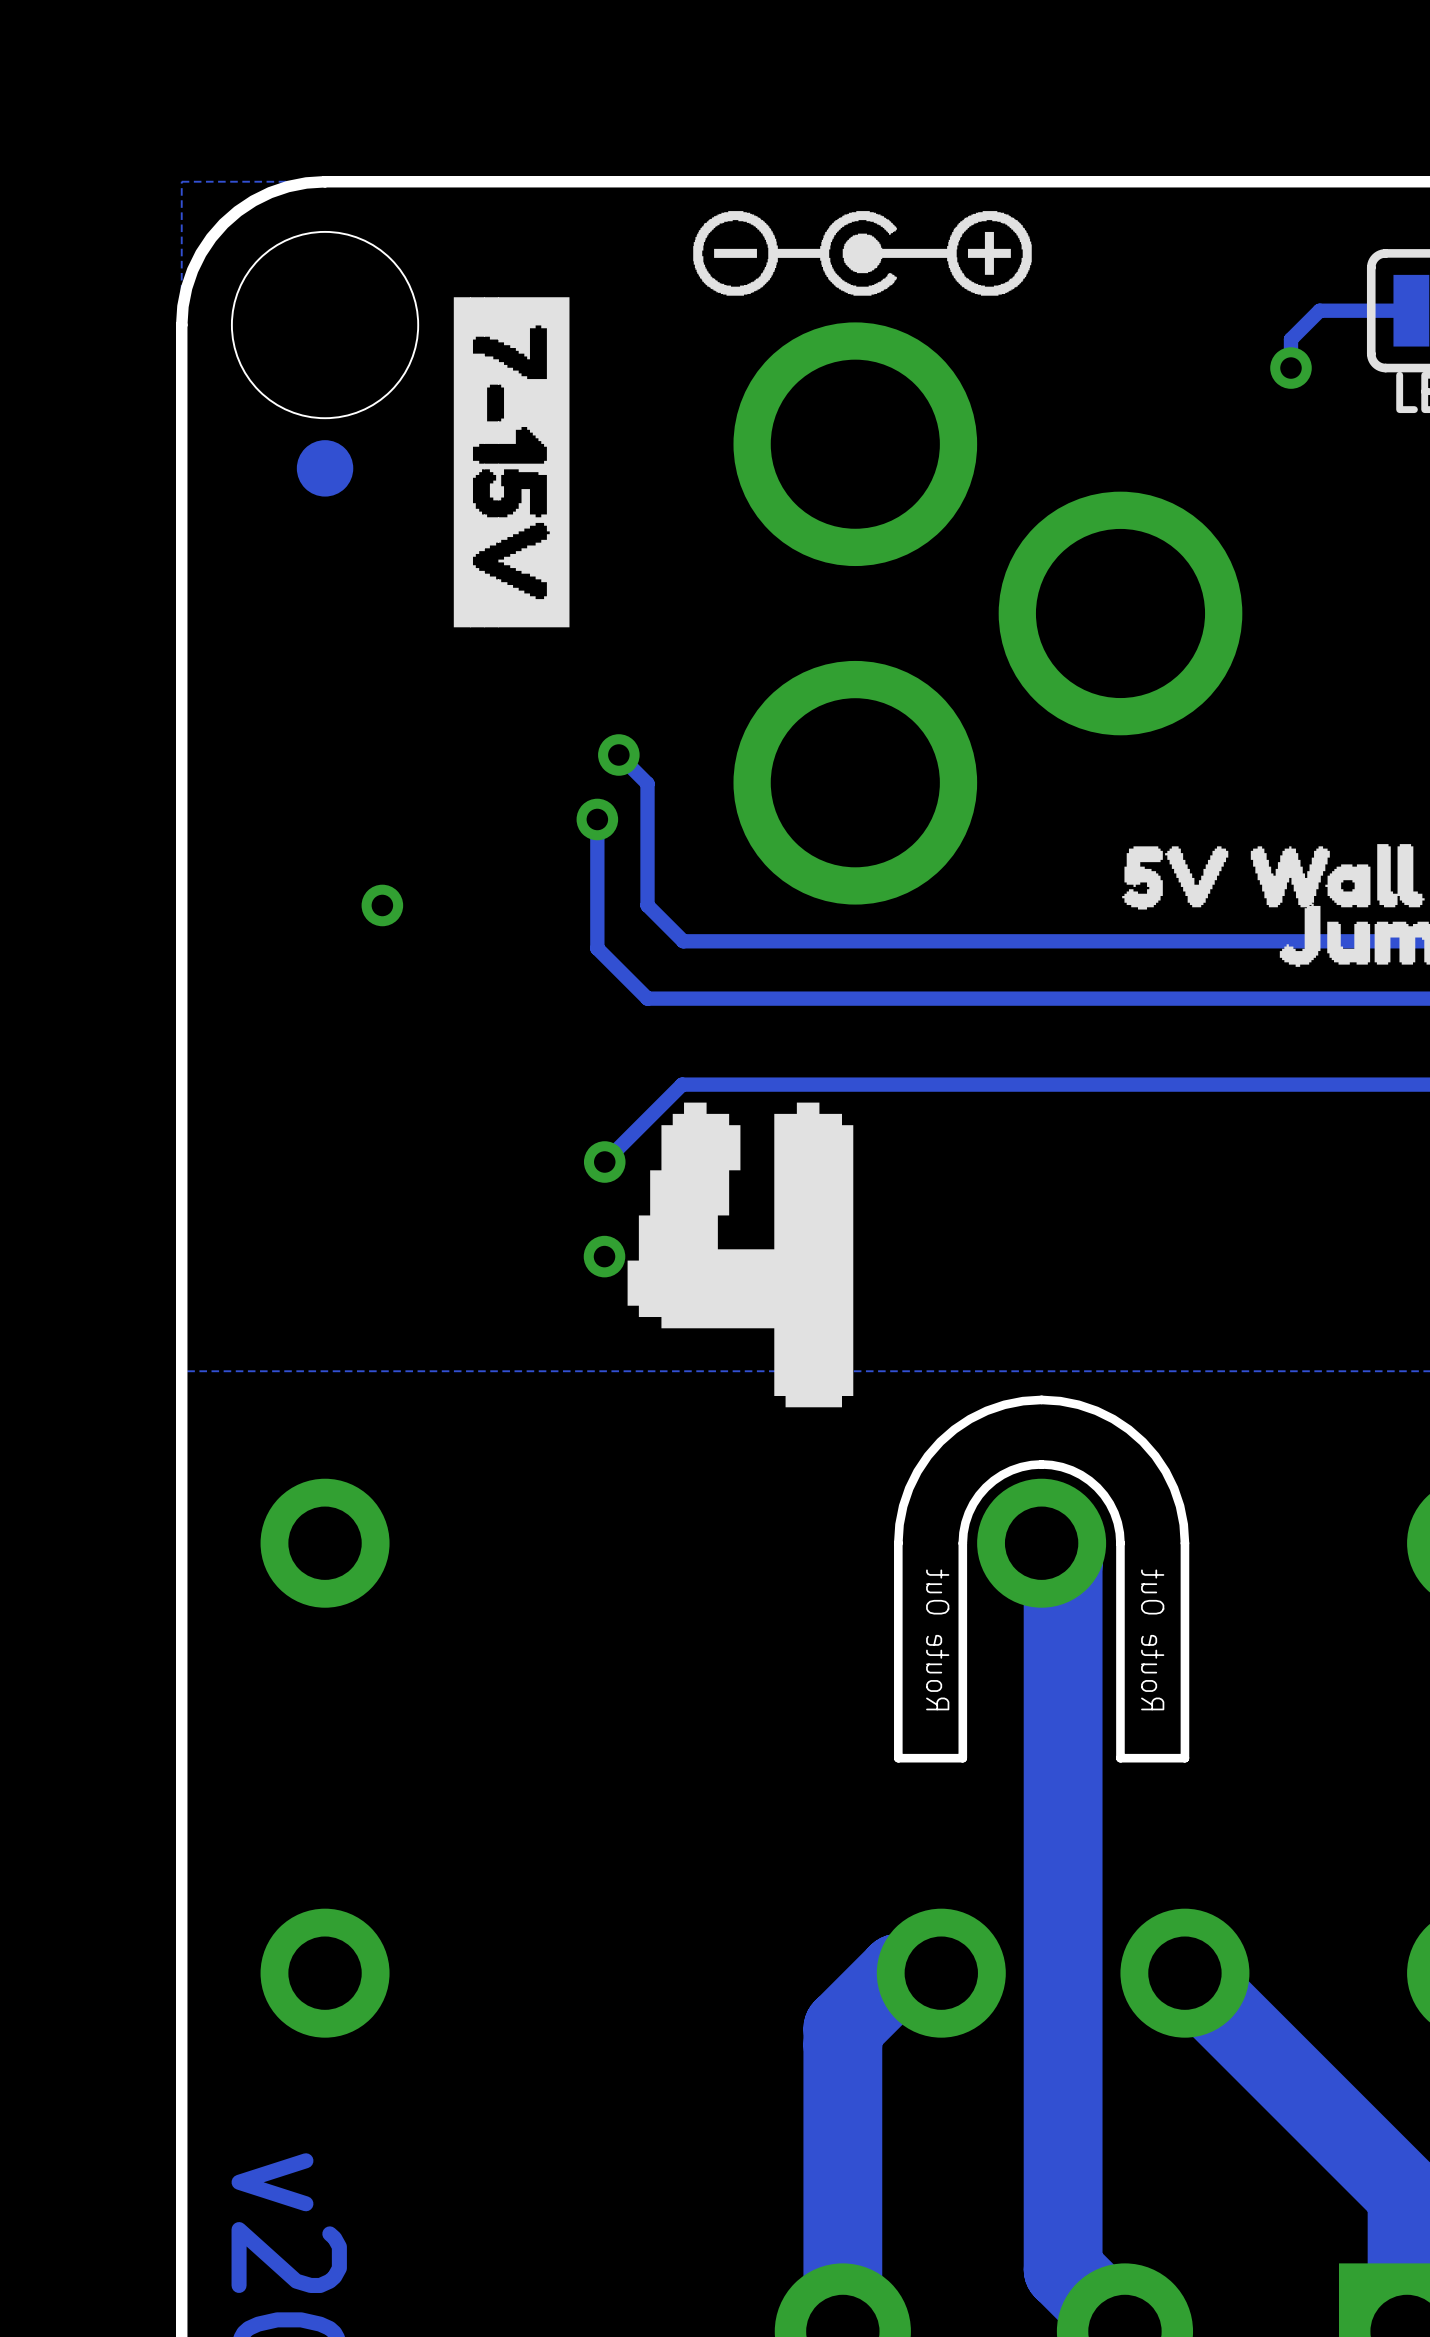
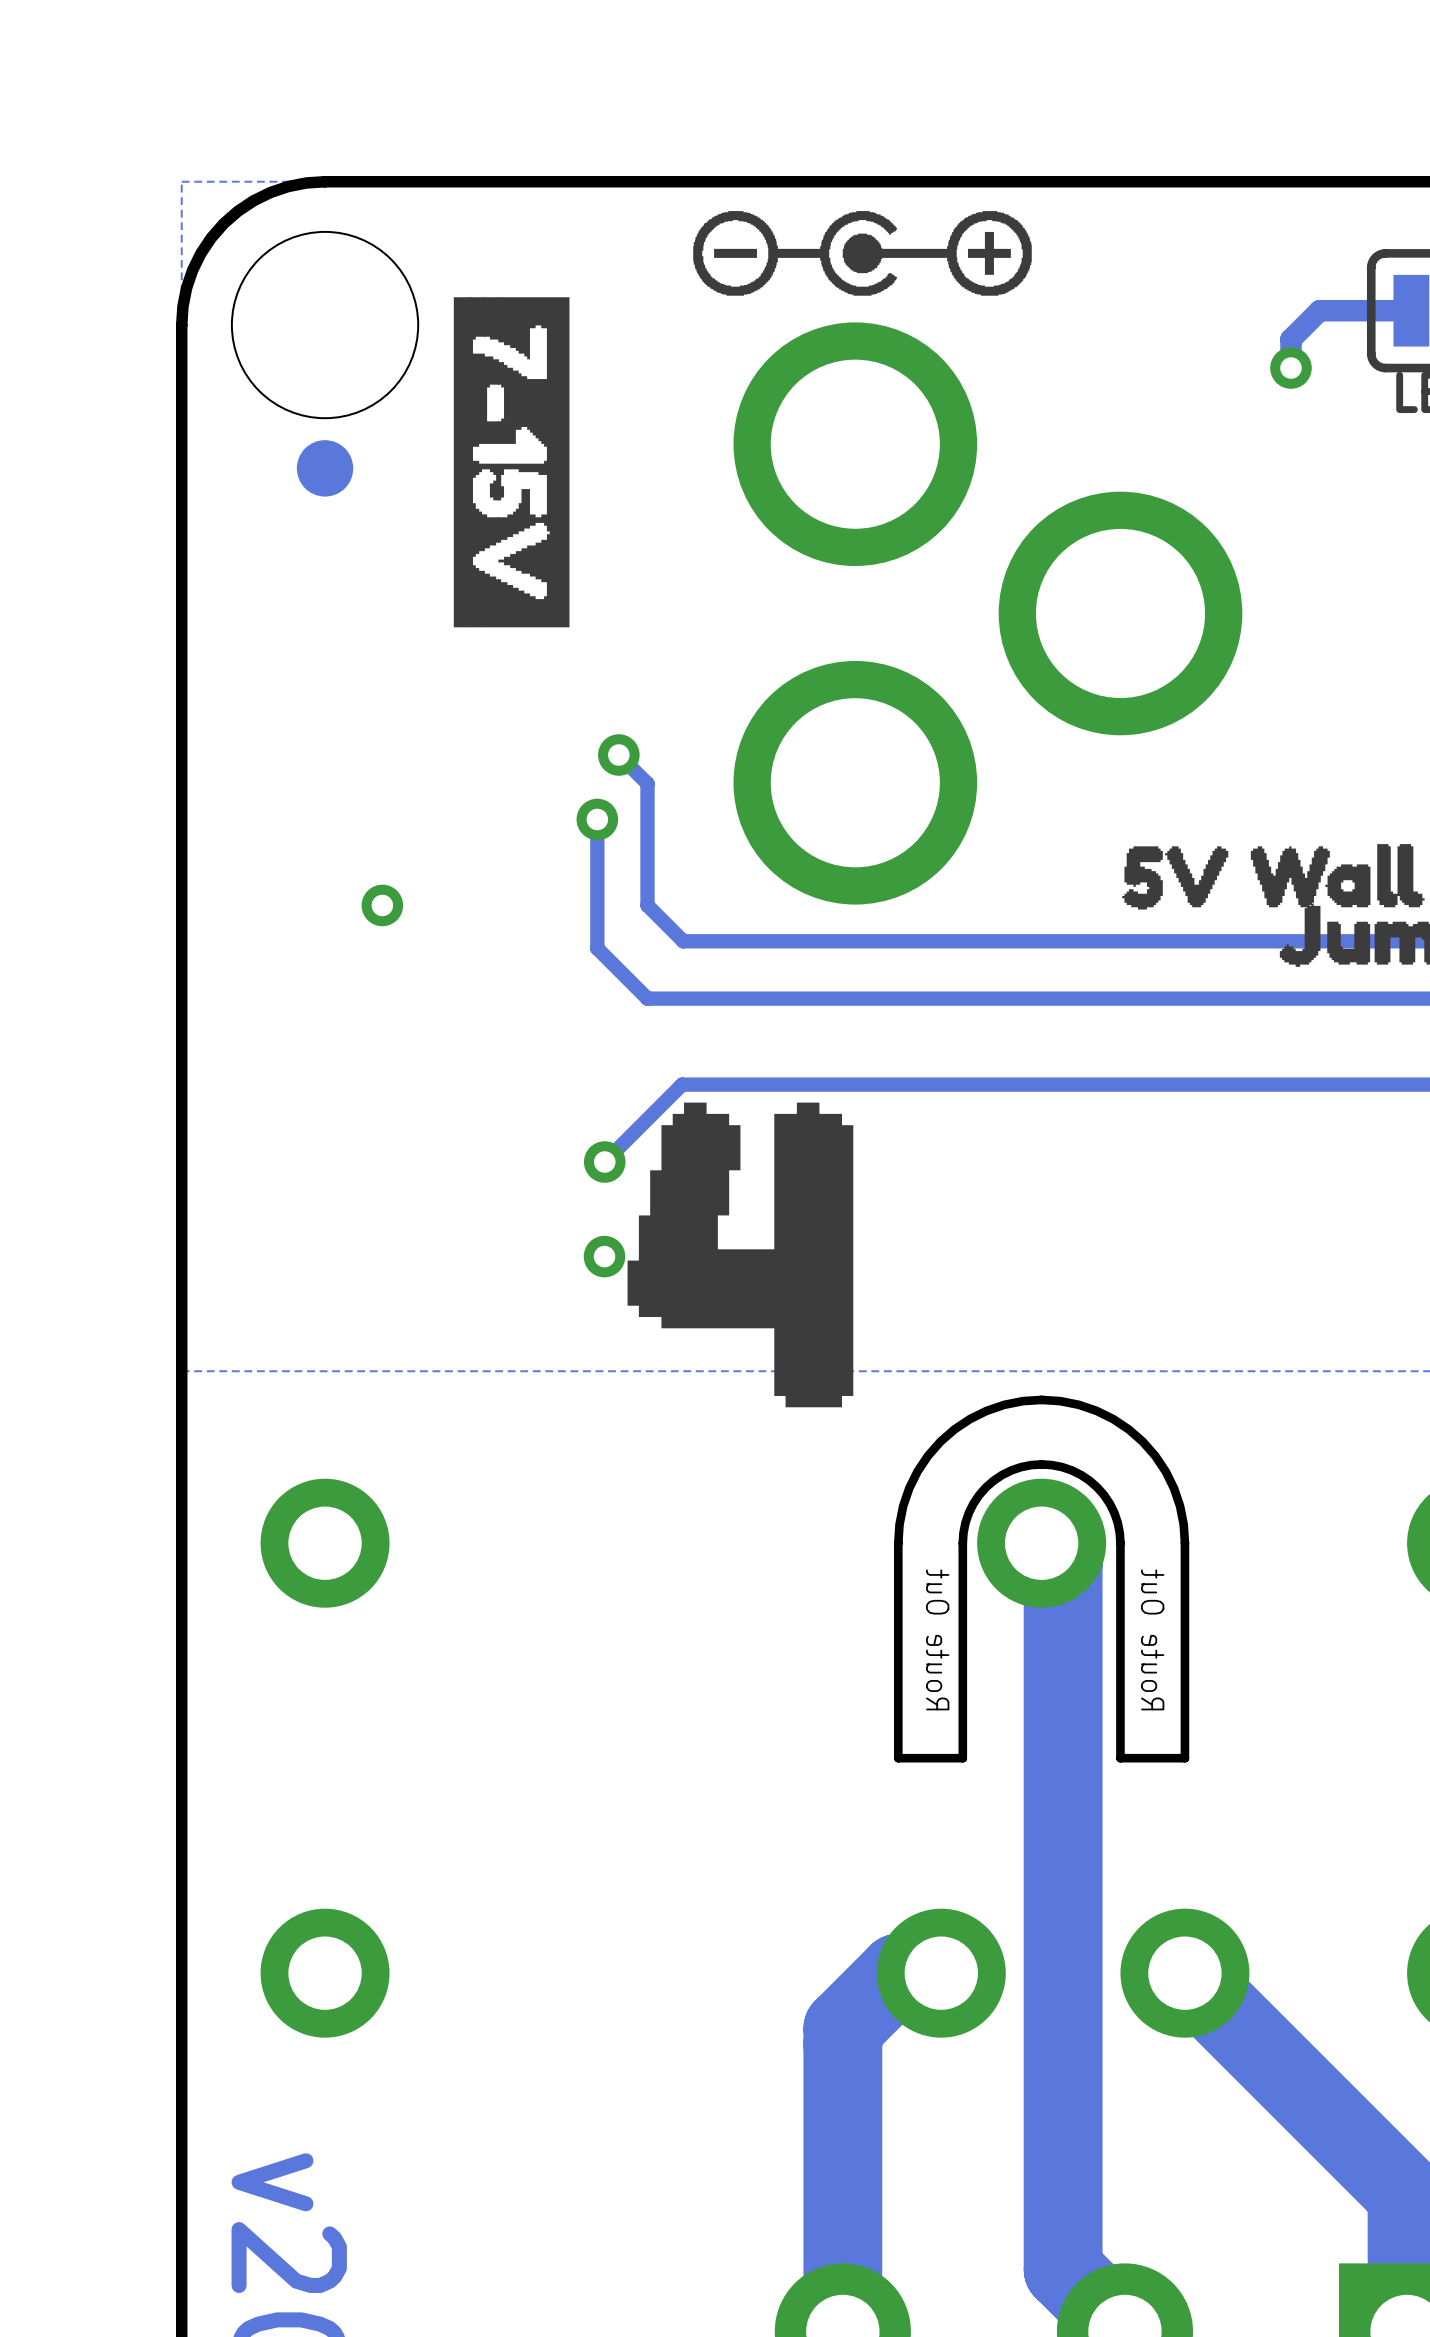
track width: thin (1411, 310) (1319, 310) (1290, 339) (1290, 368) -> thick (1411, 310) (1319, 310) (1290, 339) (1290, 368)

